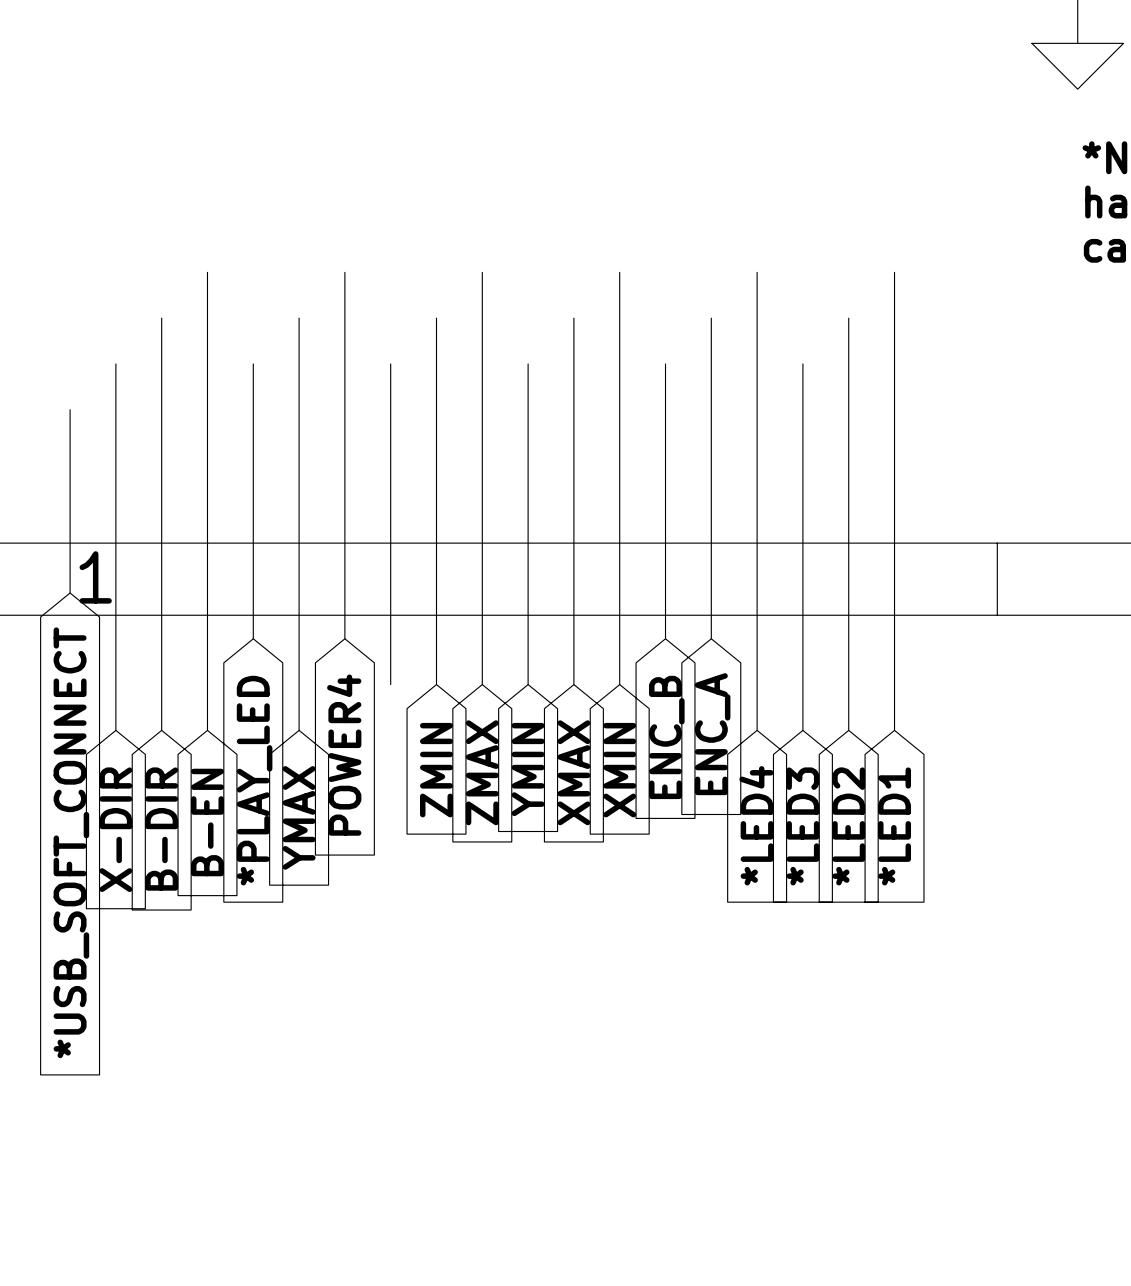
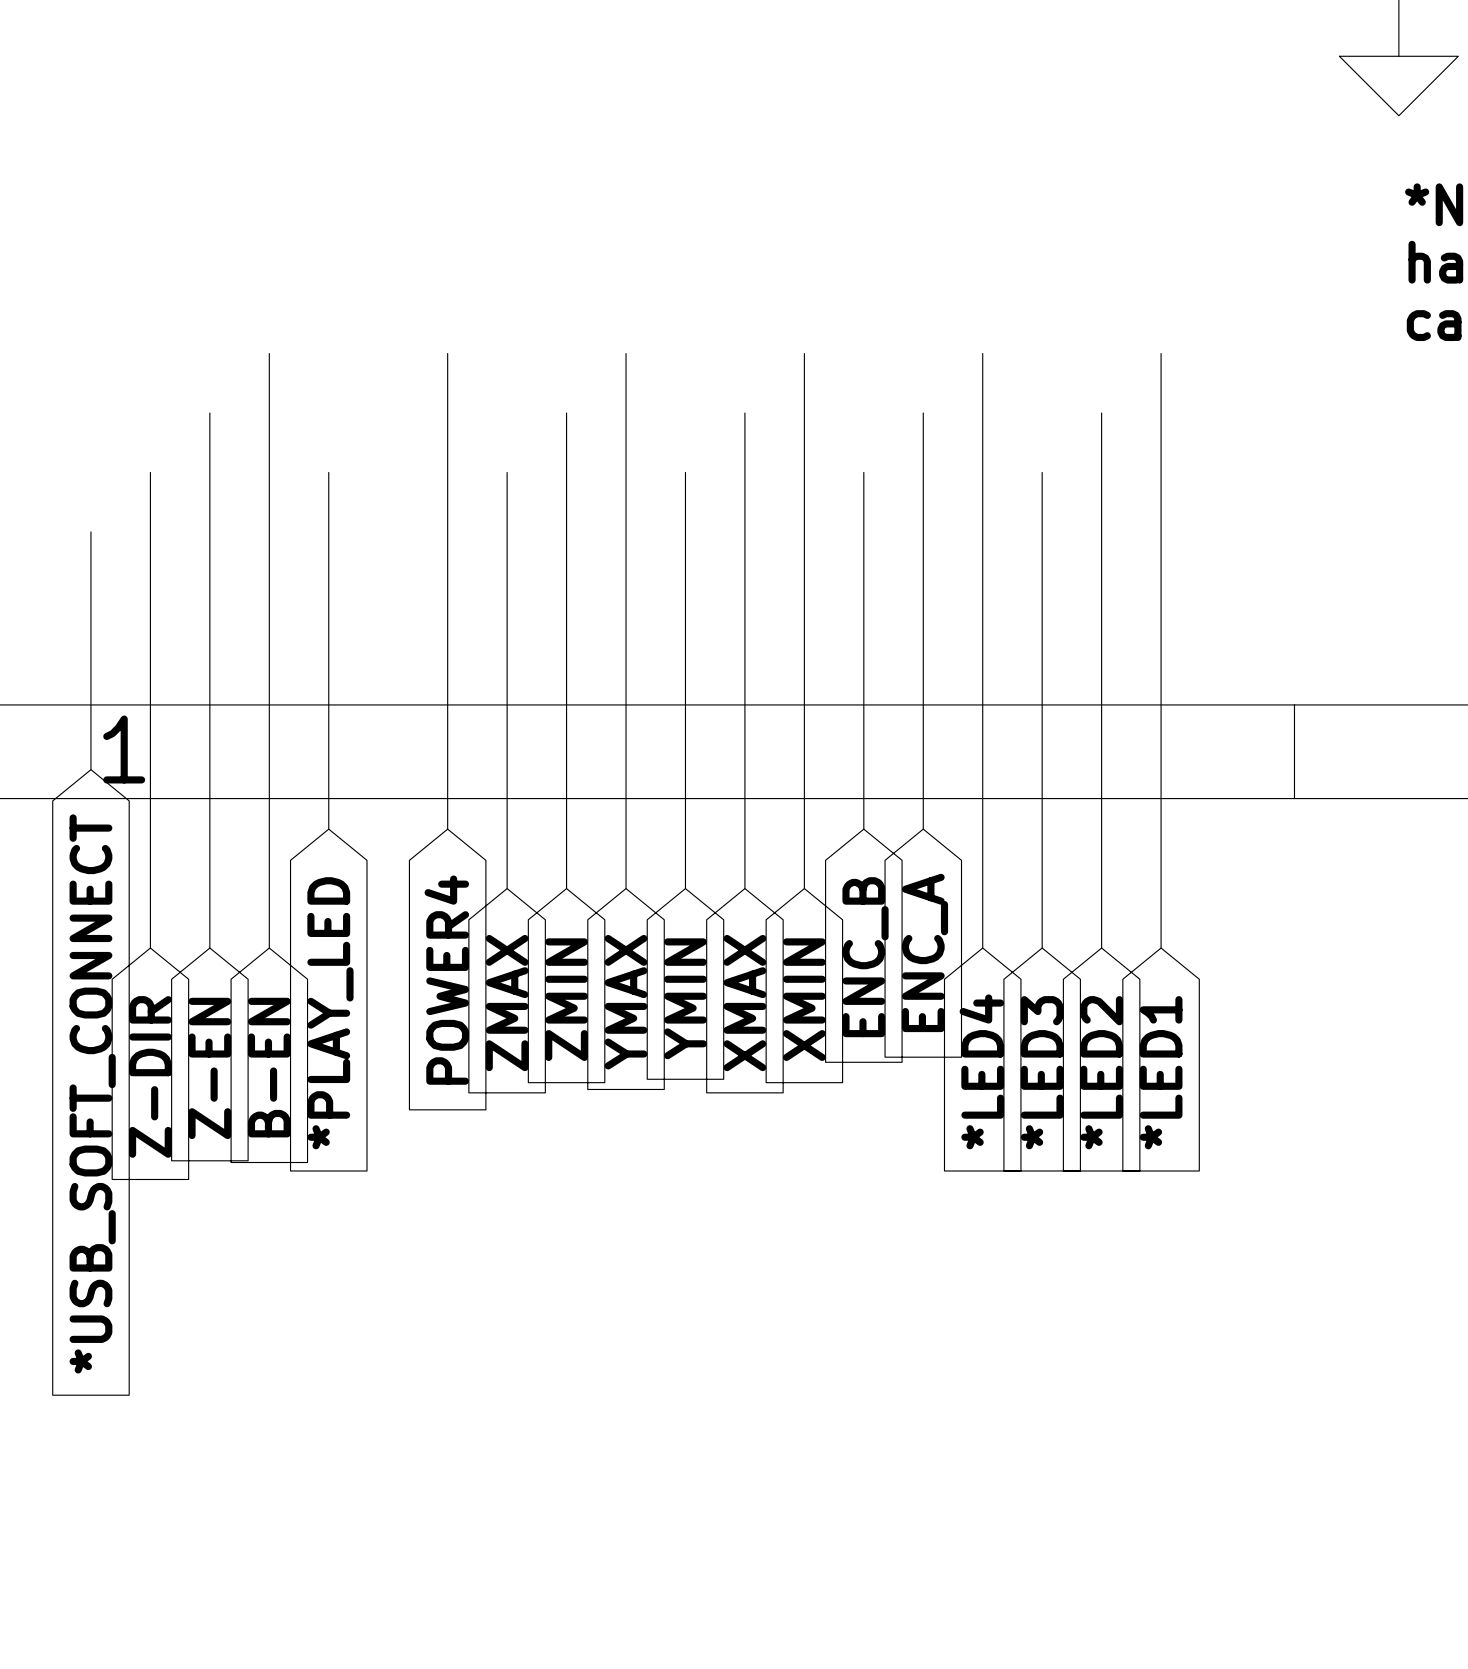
wire: (299, 318) (299, 730) -> none
global label: none -> ZMAX (507, 1003)
global label: ZMAX (482, 772) -> YMAX (626, 1002)
global label: YMAX (299, 817) -> none
global label: X-DIR (115, 829) -> Z-DIR (150, 1076)
global label: B-DIR (161, 829) -> Z-EN (209, 1068)

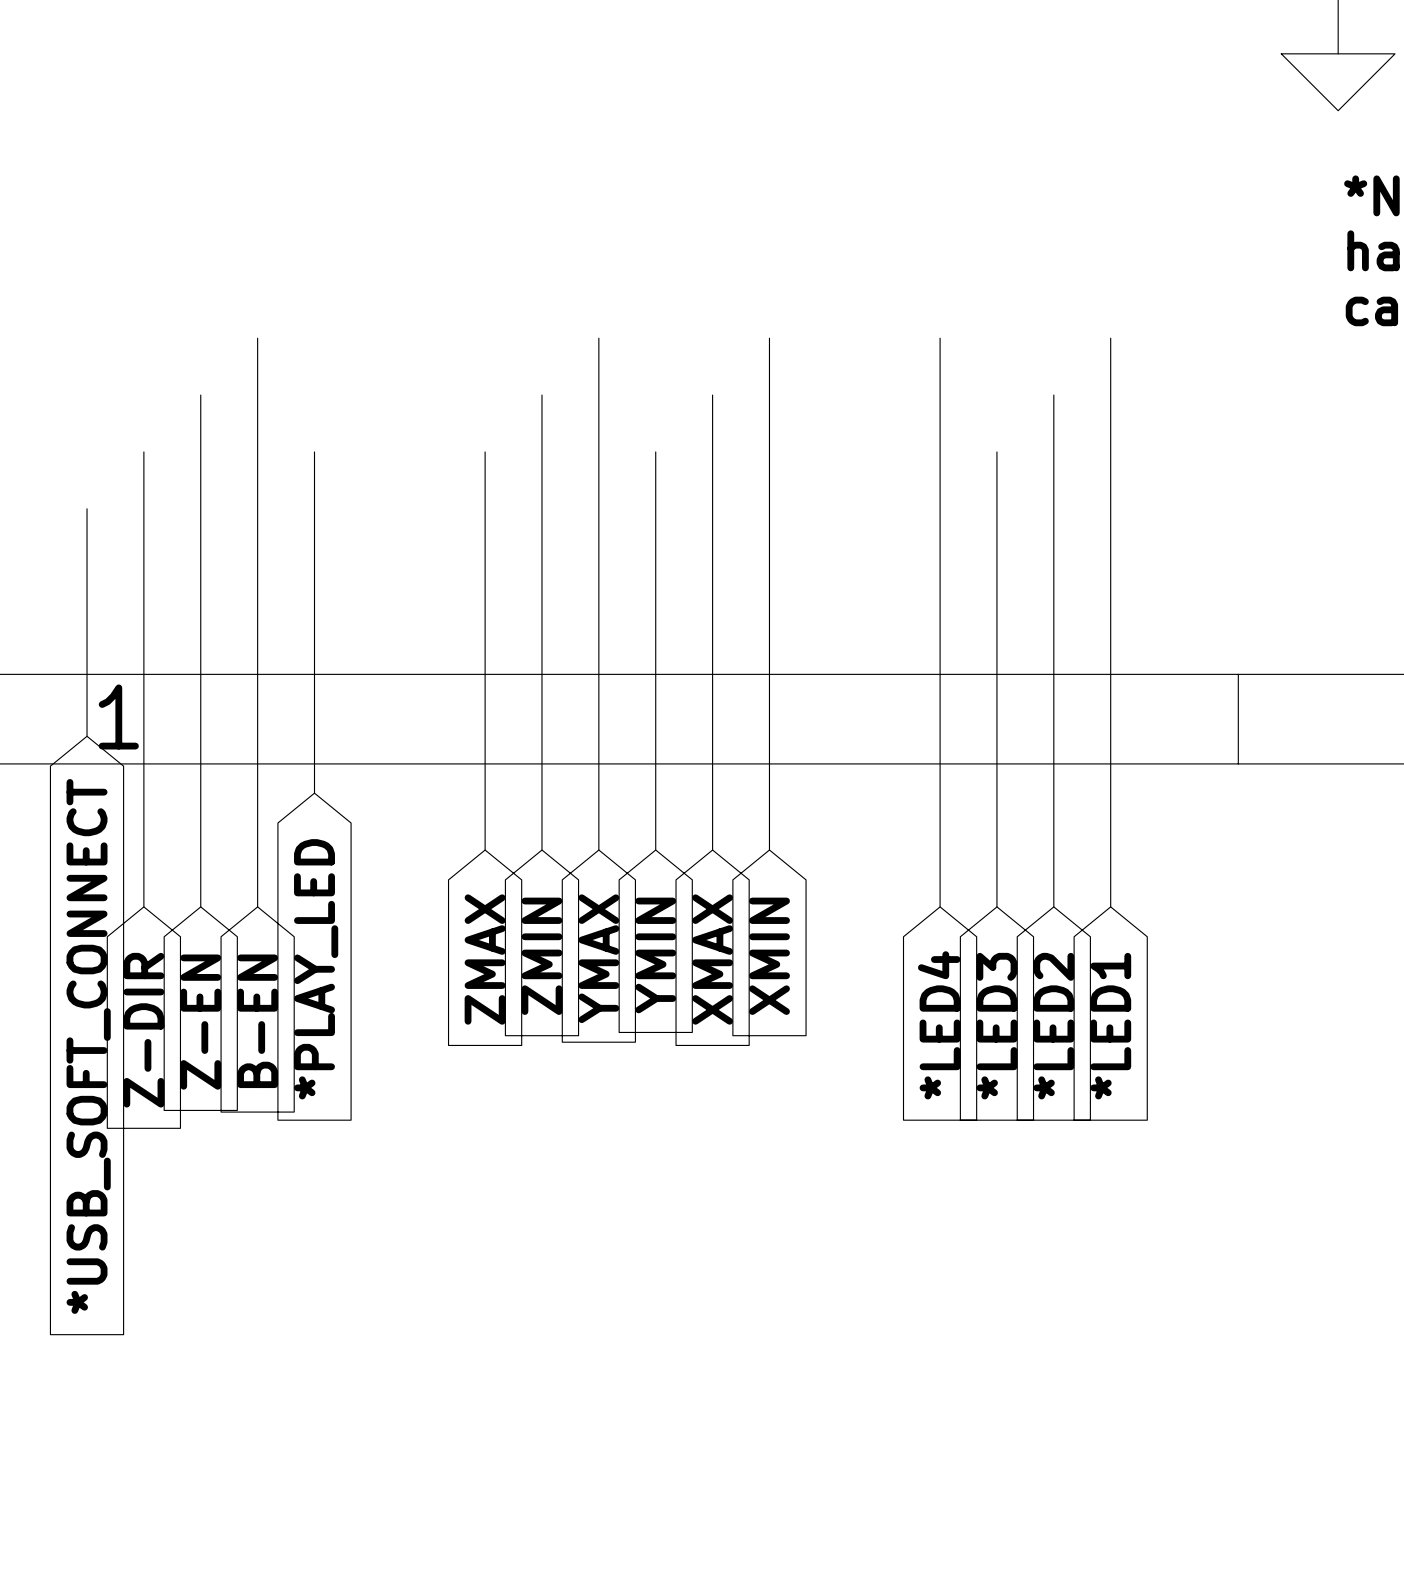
wire: (447, 353) (447, 829) -> none
wire: (923, 412) (923, 829) -> none
wire: (863, 472) (863, 829) -> none
global label: ENC_A (924, 952) -> none
global label: ENC_B (865, 957) -> none
global label: POWER4 (446, 980) -> none

